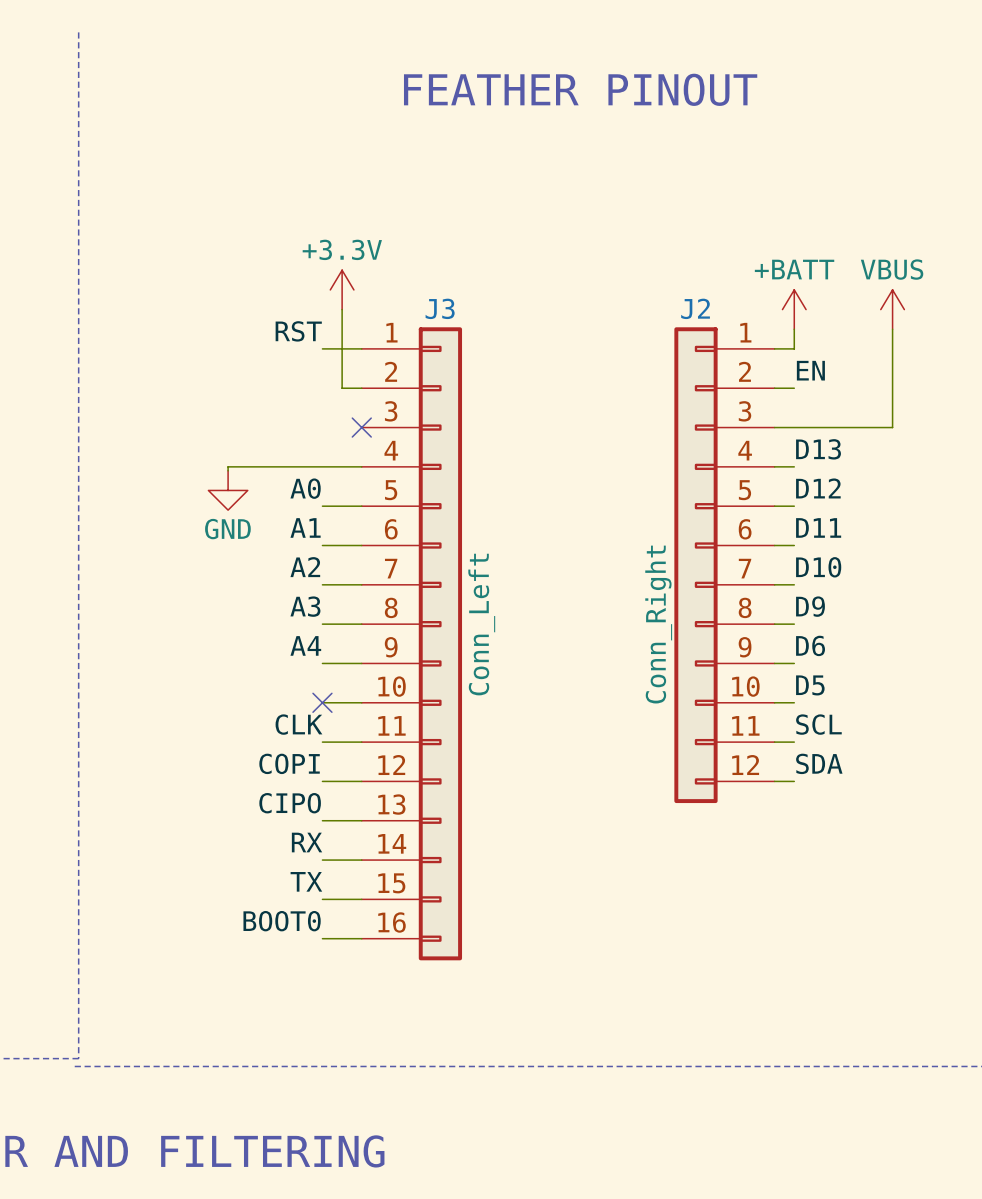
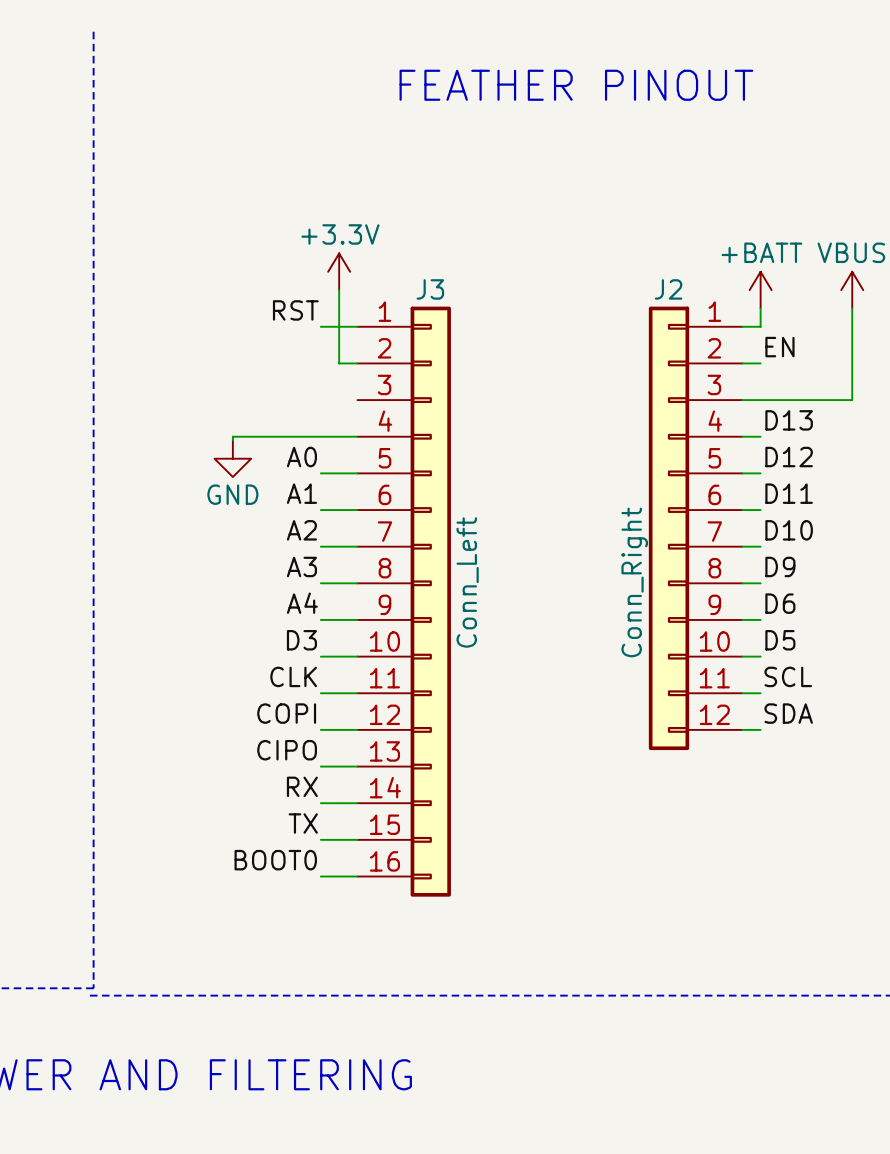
no-connect mark: (361, 427) -> none
label: none -> D3 (301, 640)
no-connect mark: (322, 702) -> none

